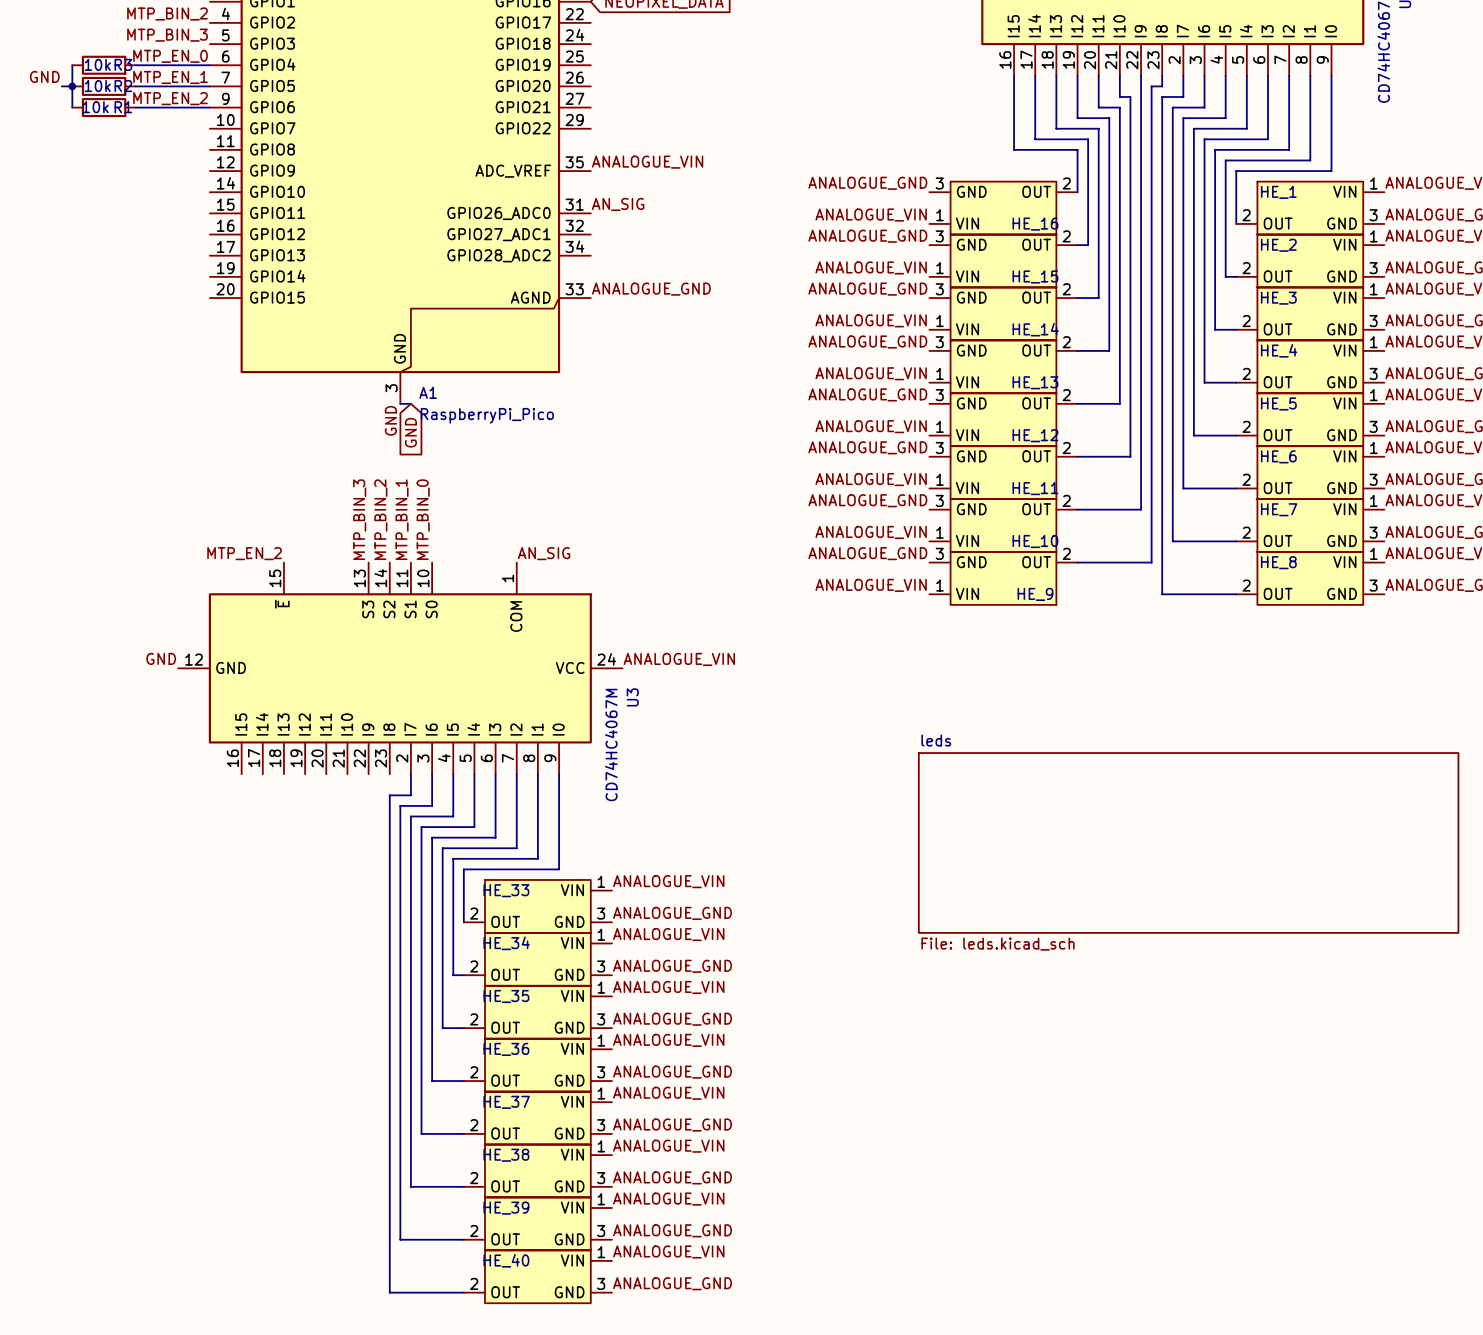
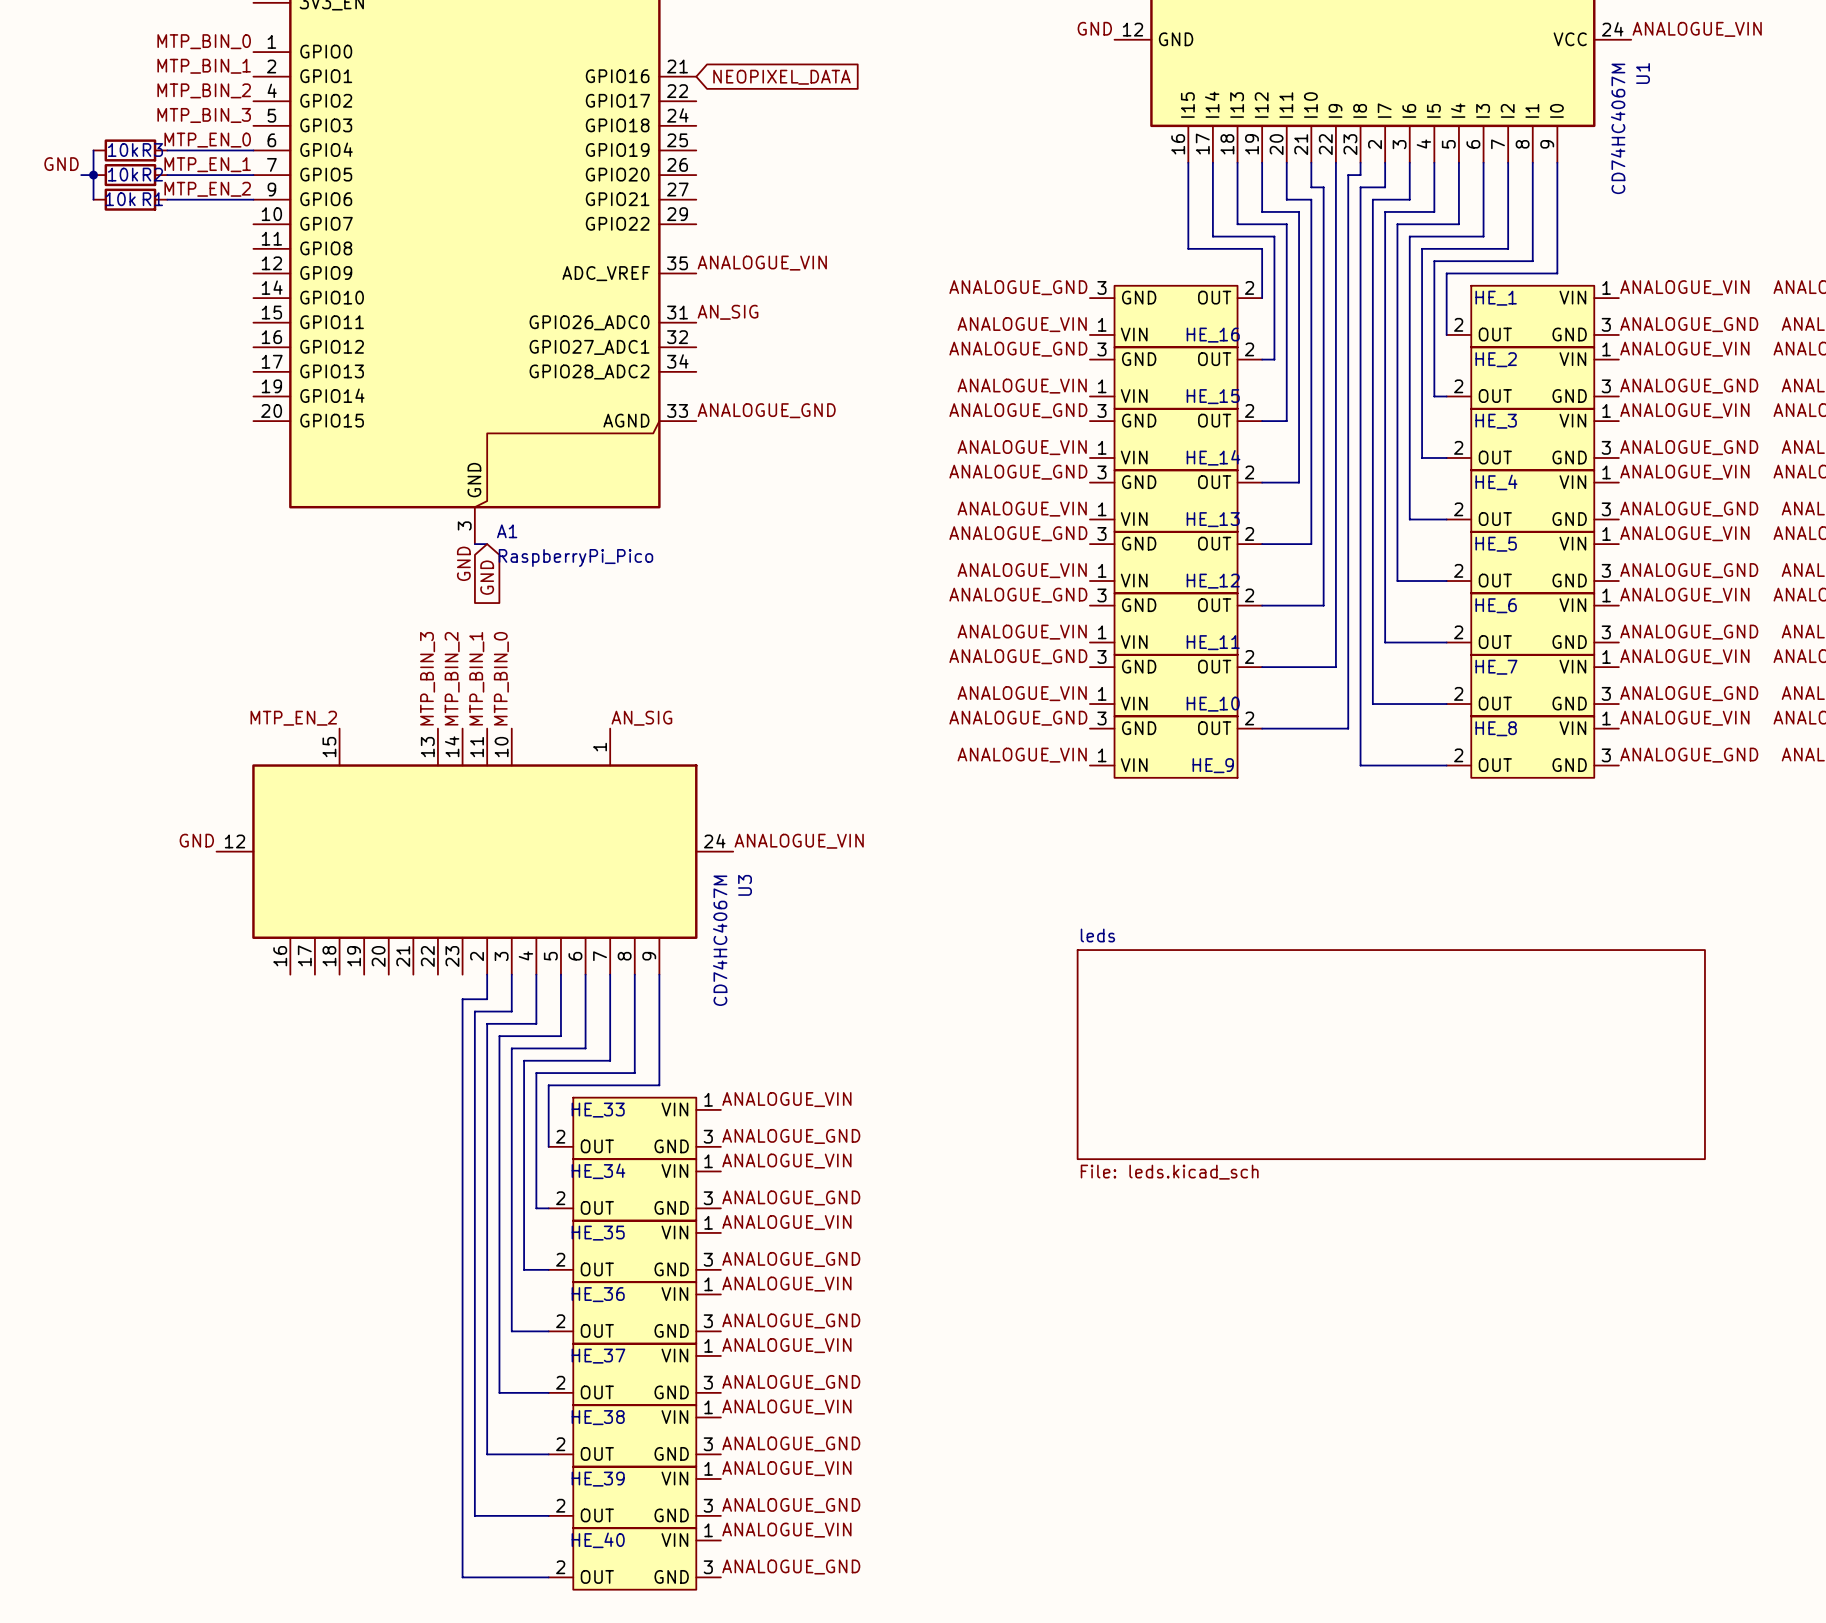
U3 symbol: [178, 562, 623, 775] -> [216, 728, 734, 975]

